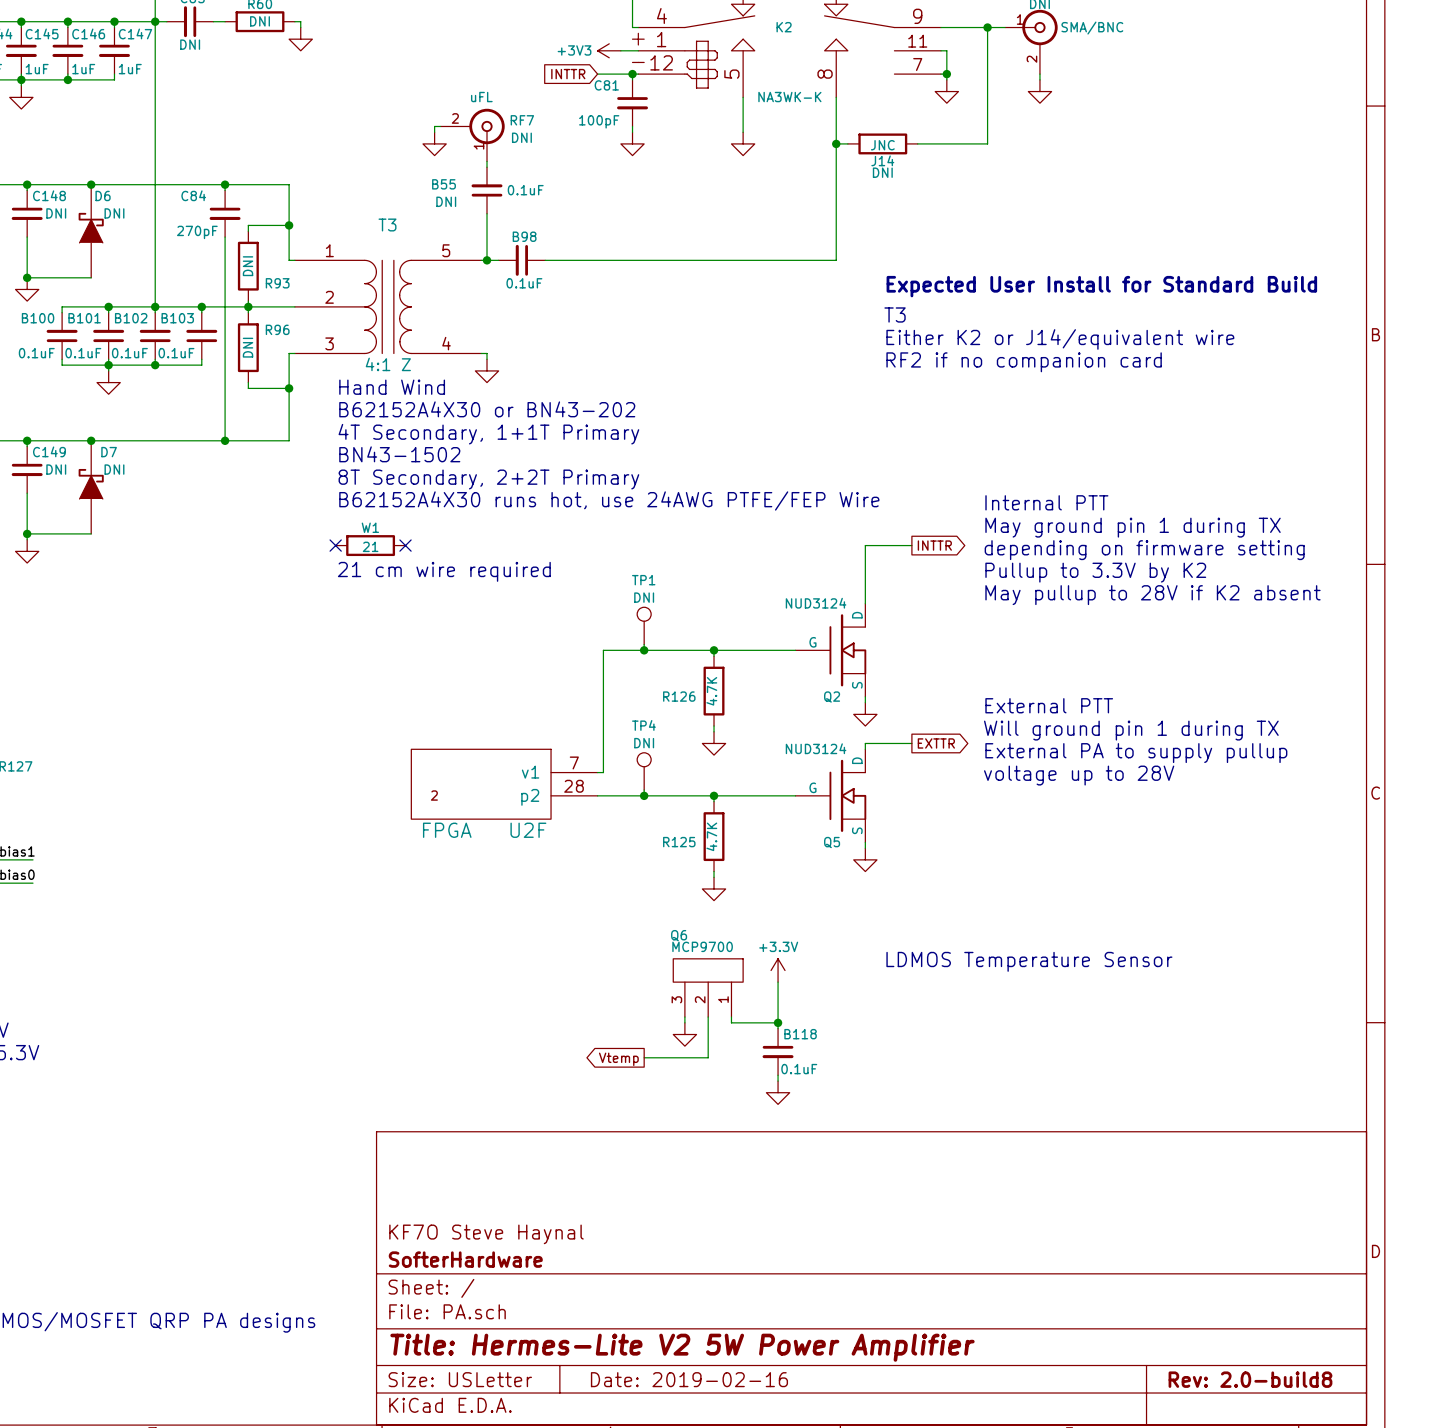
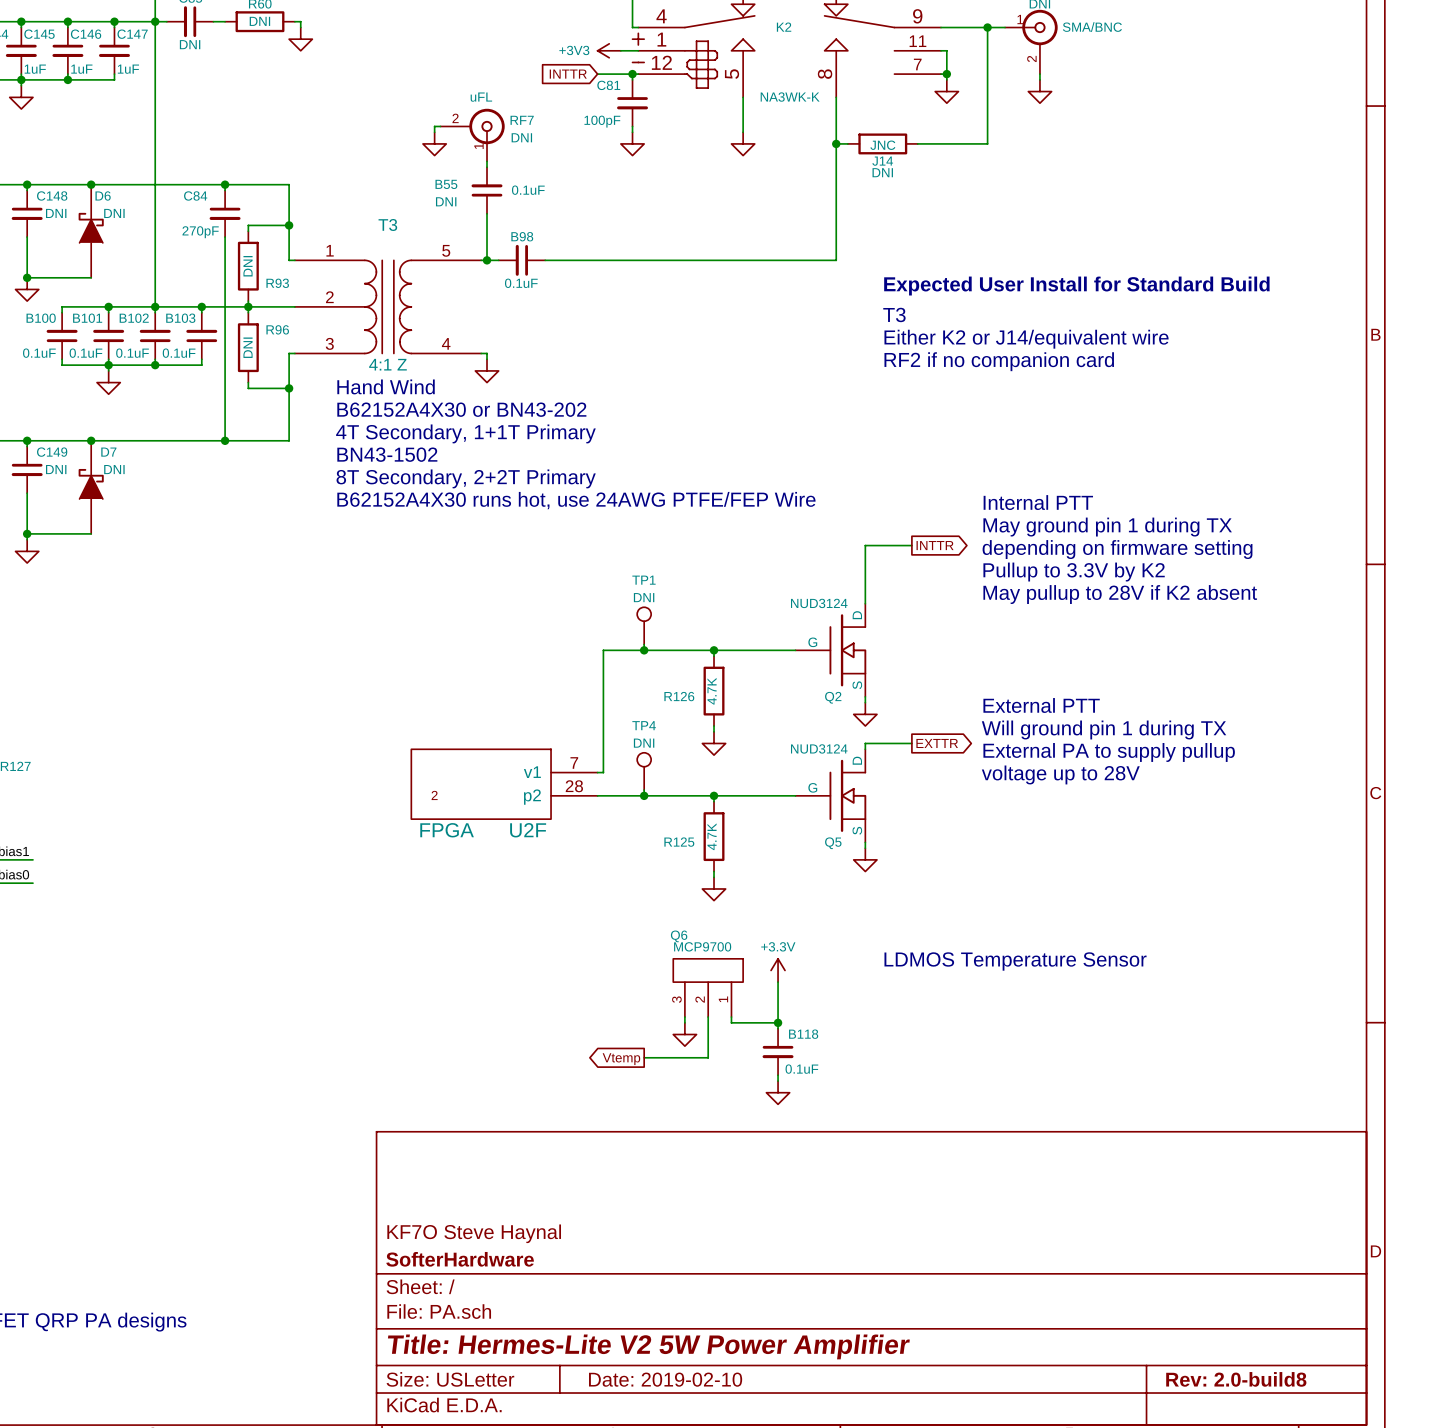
no-connect mark: (335, 545) -> none
W1: 21 (370, 545) -> none
no-connect mark: (405, 545) -> none
text: 21 cm wire required (444, 571) -> none
title block: Date: 2019-02-16 (689, 1379) -> Date: 2019-02-10 (665, 1379)

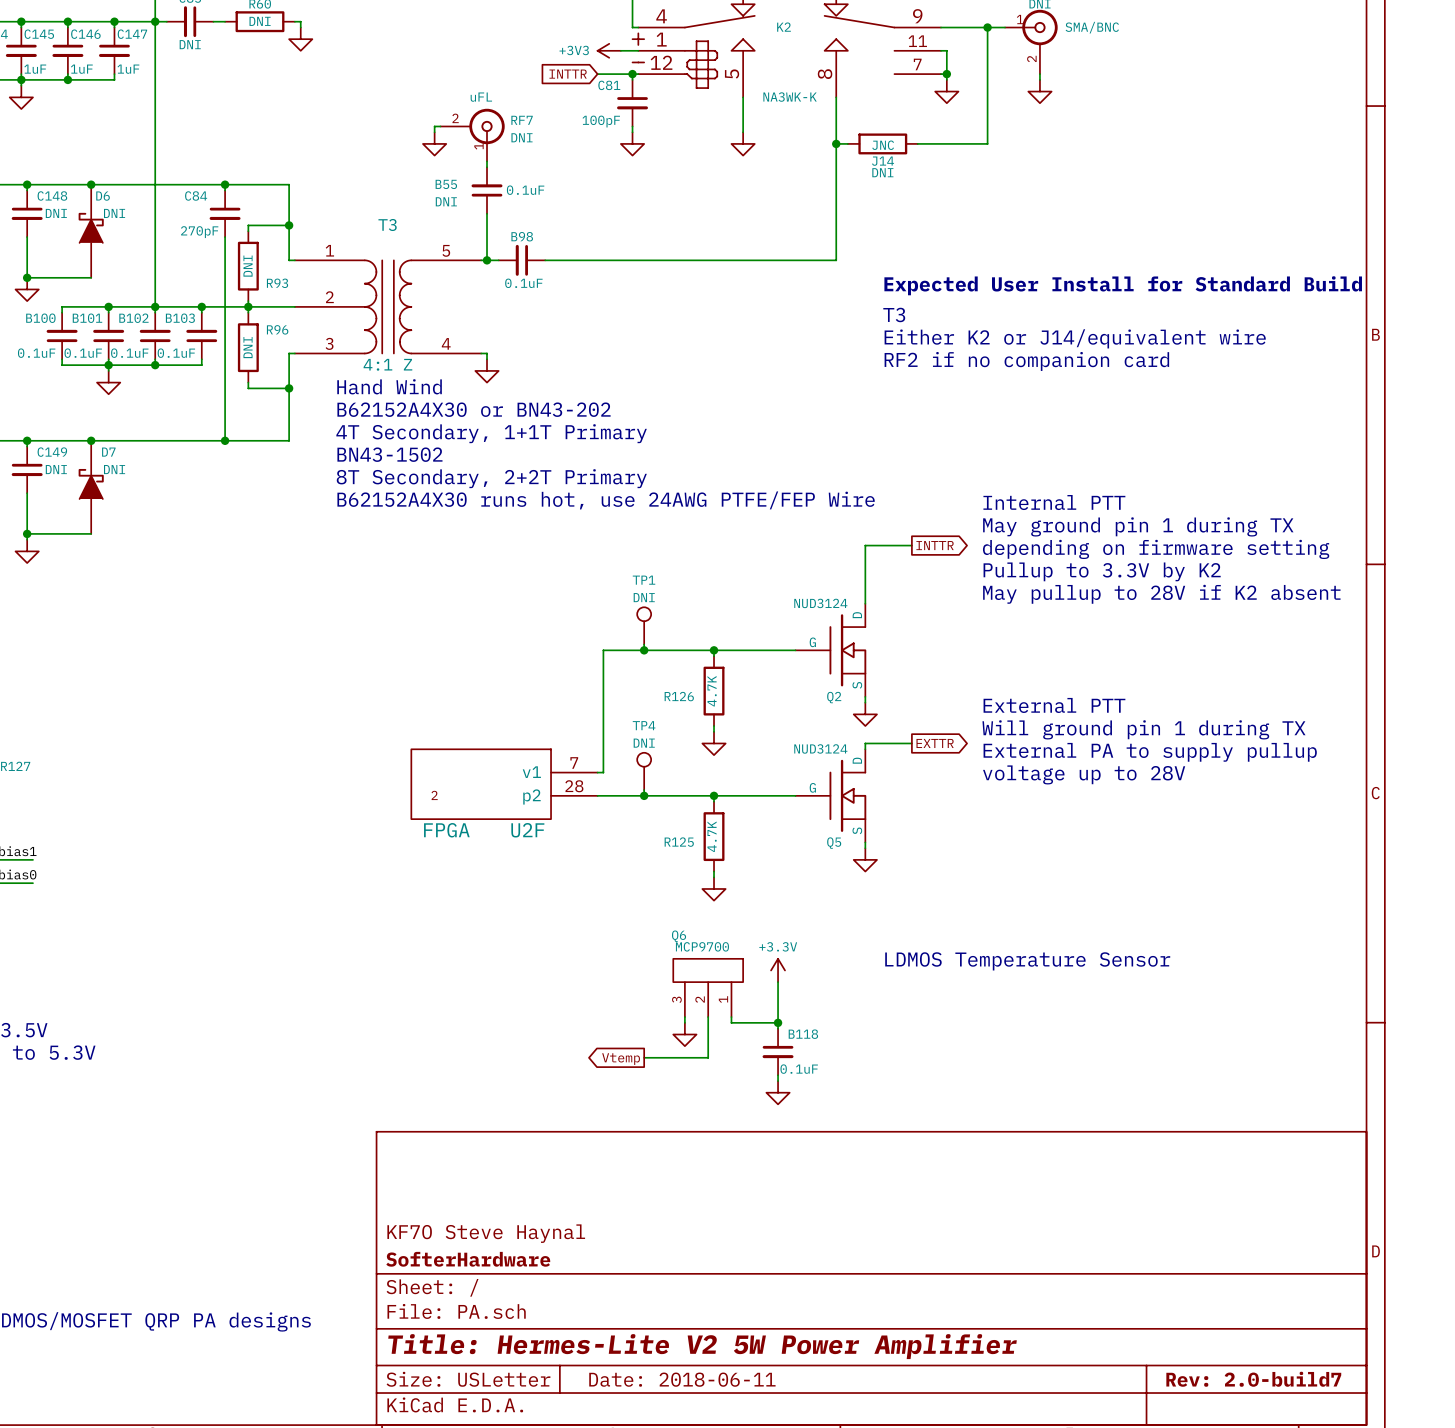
title block: Date: 2019-02-10 (665, 1379) -> Date: 2018-06-11 (682, 1379)
title block: Rev: 2.0-build8 (1236, 1379) -> Rev: 2.0-build7 (1253, 1379)

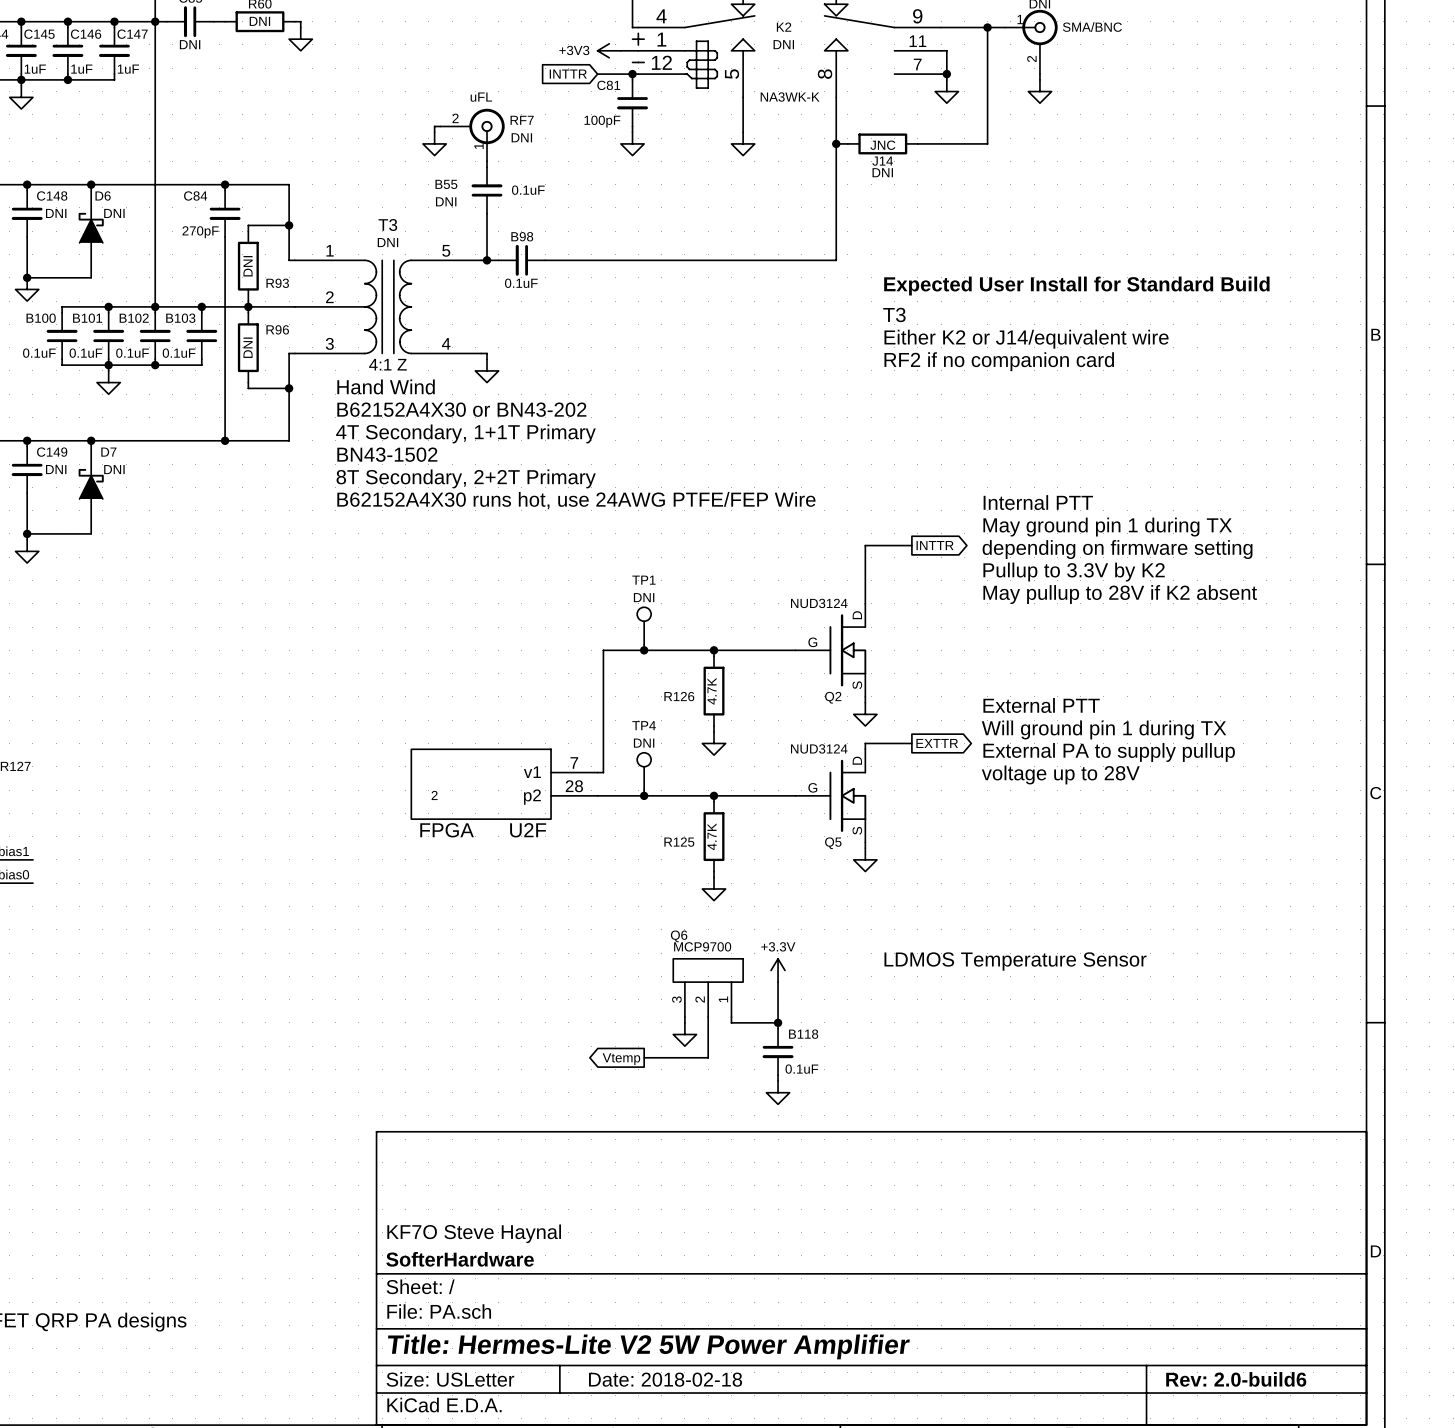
K2 text: none -> DNI (783, 44)
T3 text: none -> DNI (387, 242)
title block: Date: 2018-06-11 (682, 1379) -> Date: 2018-02-18 (665, 1379)
title block: Rev: 2.0-build7 (1253, 1379) -> Rev: 2.0-build6 (1236, 1379)

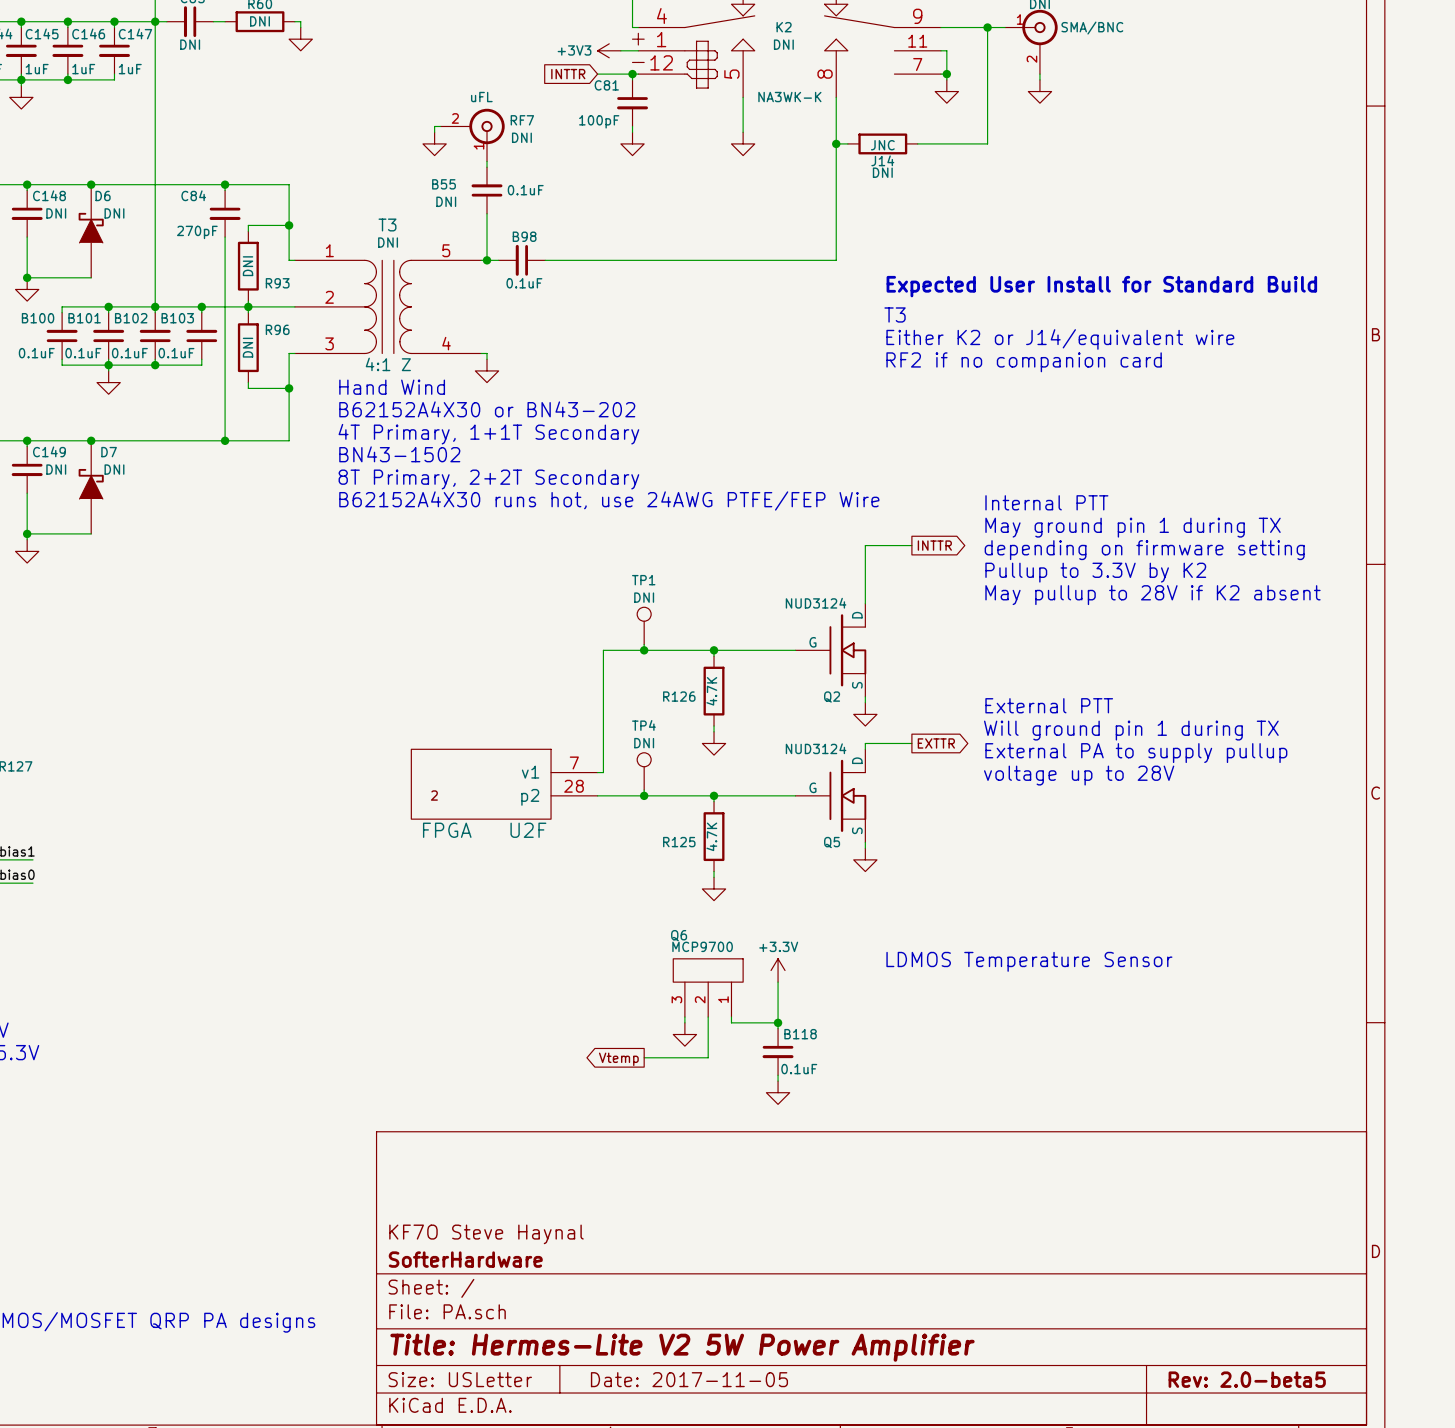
text: 4T Secondary, 1+1T Primary (465, 433) -> 4T Primary, 1+1T Secondary (488, 434)
text: 8T Secondary, 2+2T Primary (466, 478) -> 8T Primary, 2+2T Secondary (488, 479)
title block: Date: 2018-02-18 (665, 1379) -> Date: 2017-11-05 (689, 1379)
title block: Rev: 2.0-build6 (1236, 1379) -> Rev: 2.0-beta5 (1247, 1379)

